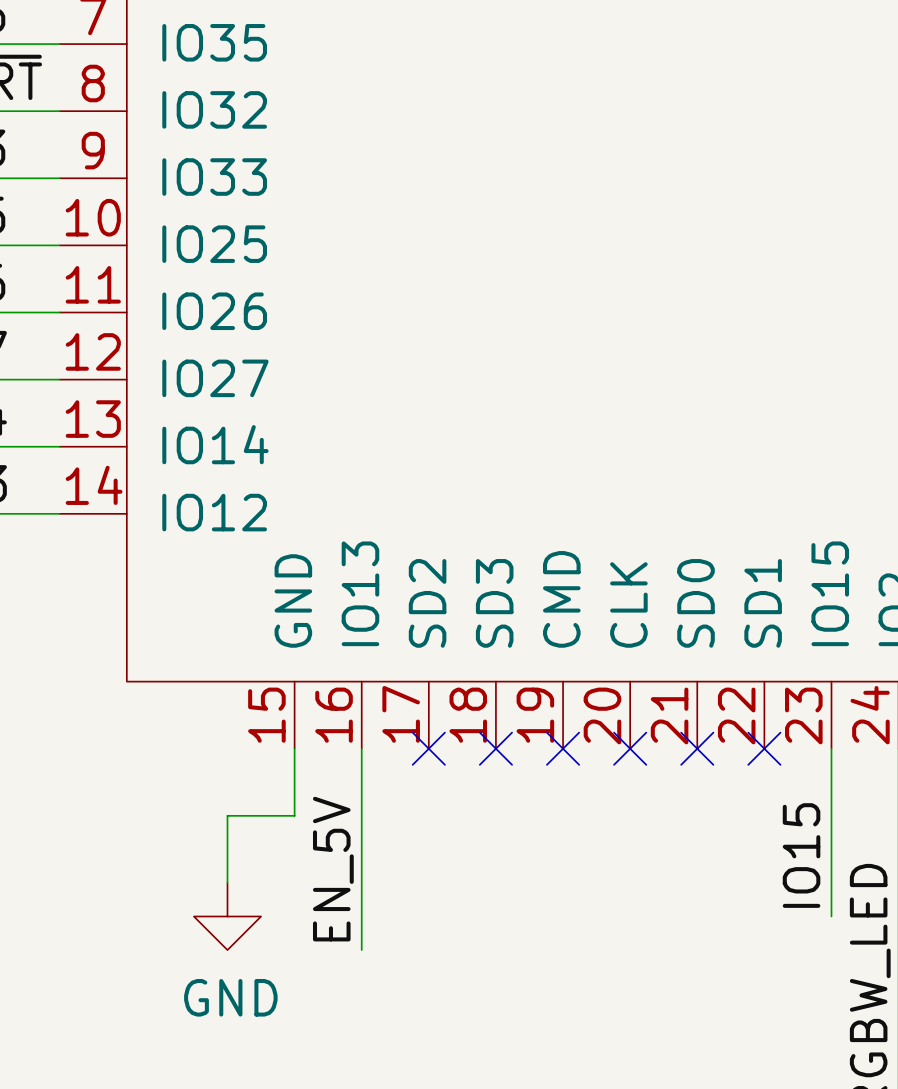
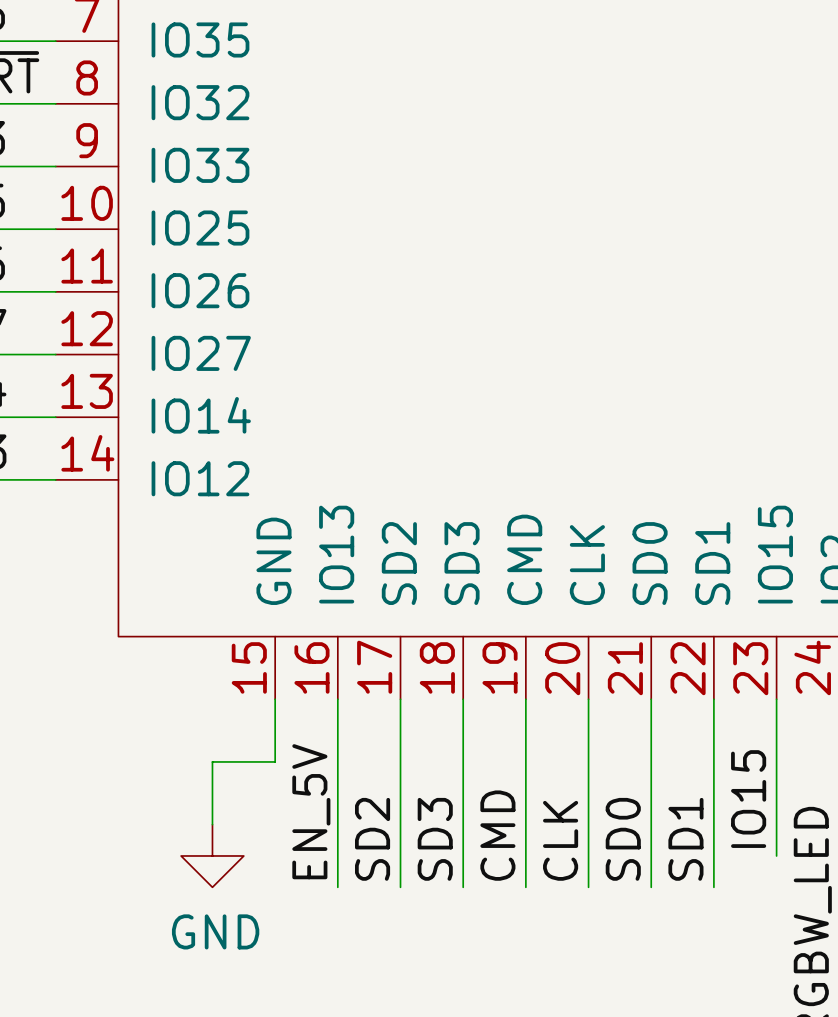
wire: none -> (400, 699) (400, 887)
no-connect mark: (428, 748) -> none
wire: none -> (463, 699) (463, 887)
no-connect mark: (495, 748) -> none
wire: none -> (525, 699) (525, 887)
no-connect mark: (563, 748) -> none
wire: none -> (588, 699) (588, 887)
no-connect mark: (630, 748) -> none
wire: none -> (651, 699) (651, 887)
no-connect mark: (697, 748) -> none
wire: none -> (713, 699) (713, 887)
no-connect mark: (764, 748) -> none
label: none -> CMD (497, 835)
label: none -> SD2 (372, 839)
label: none -> SD3 (435, 839)
label: none -> SD0 (623, 839)
label: none -> SD1 (685, 839)
label: none -> CLK (560, 840)

